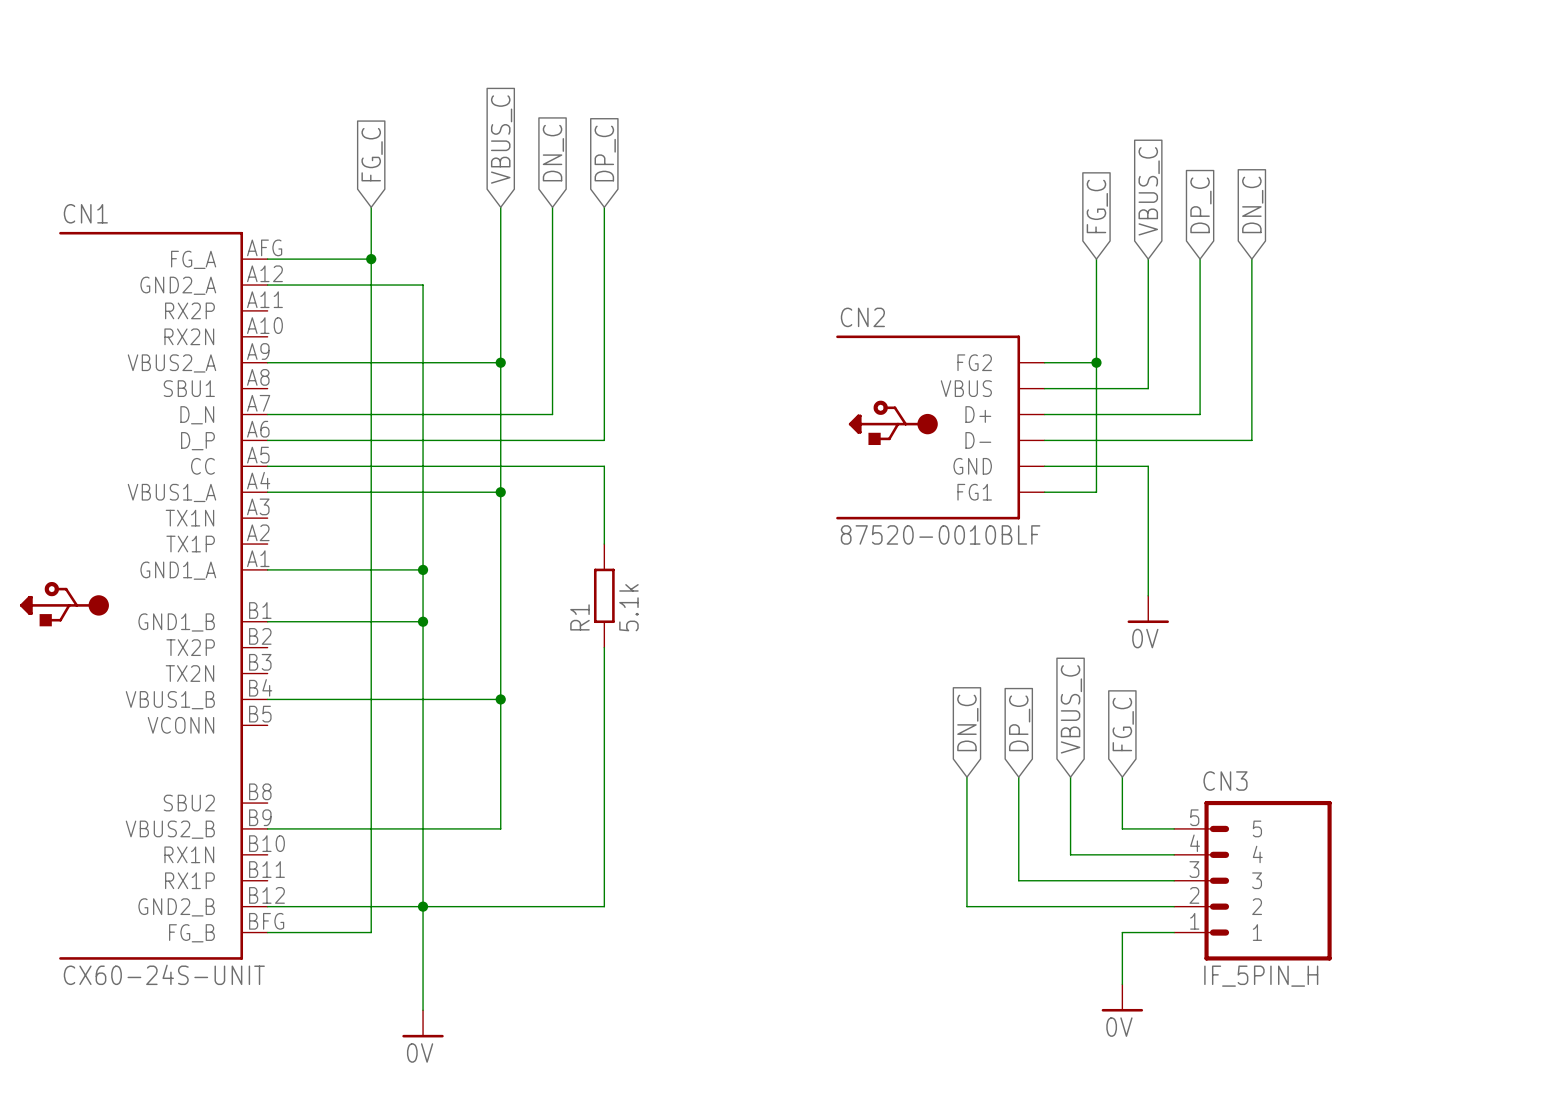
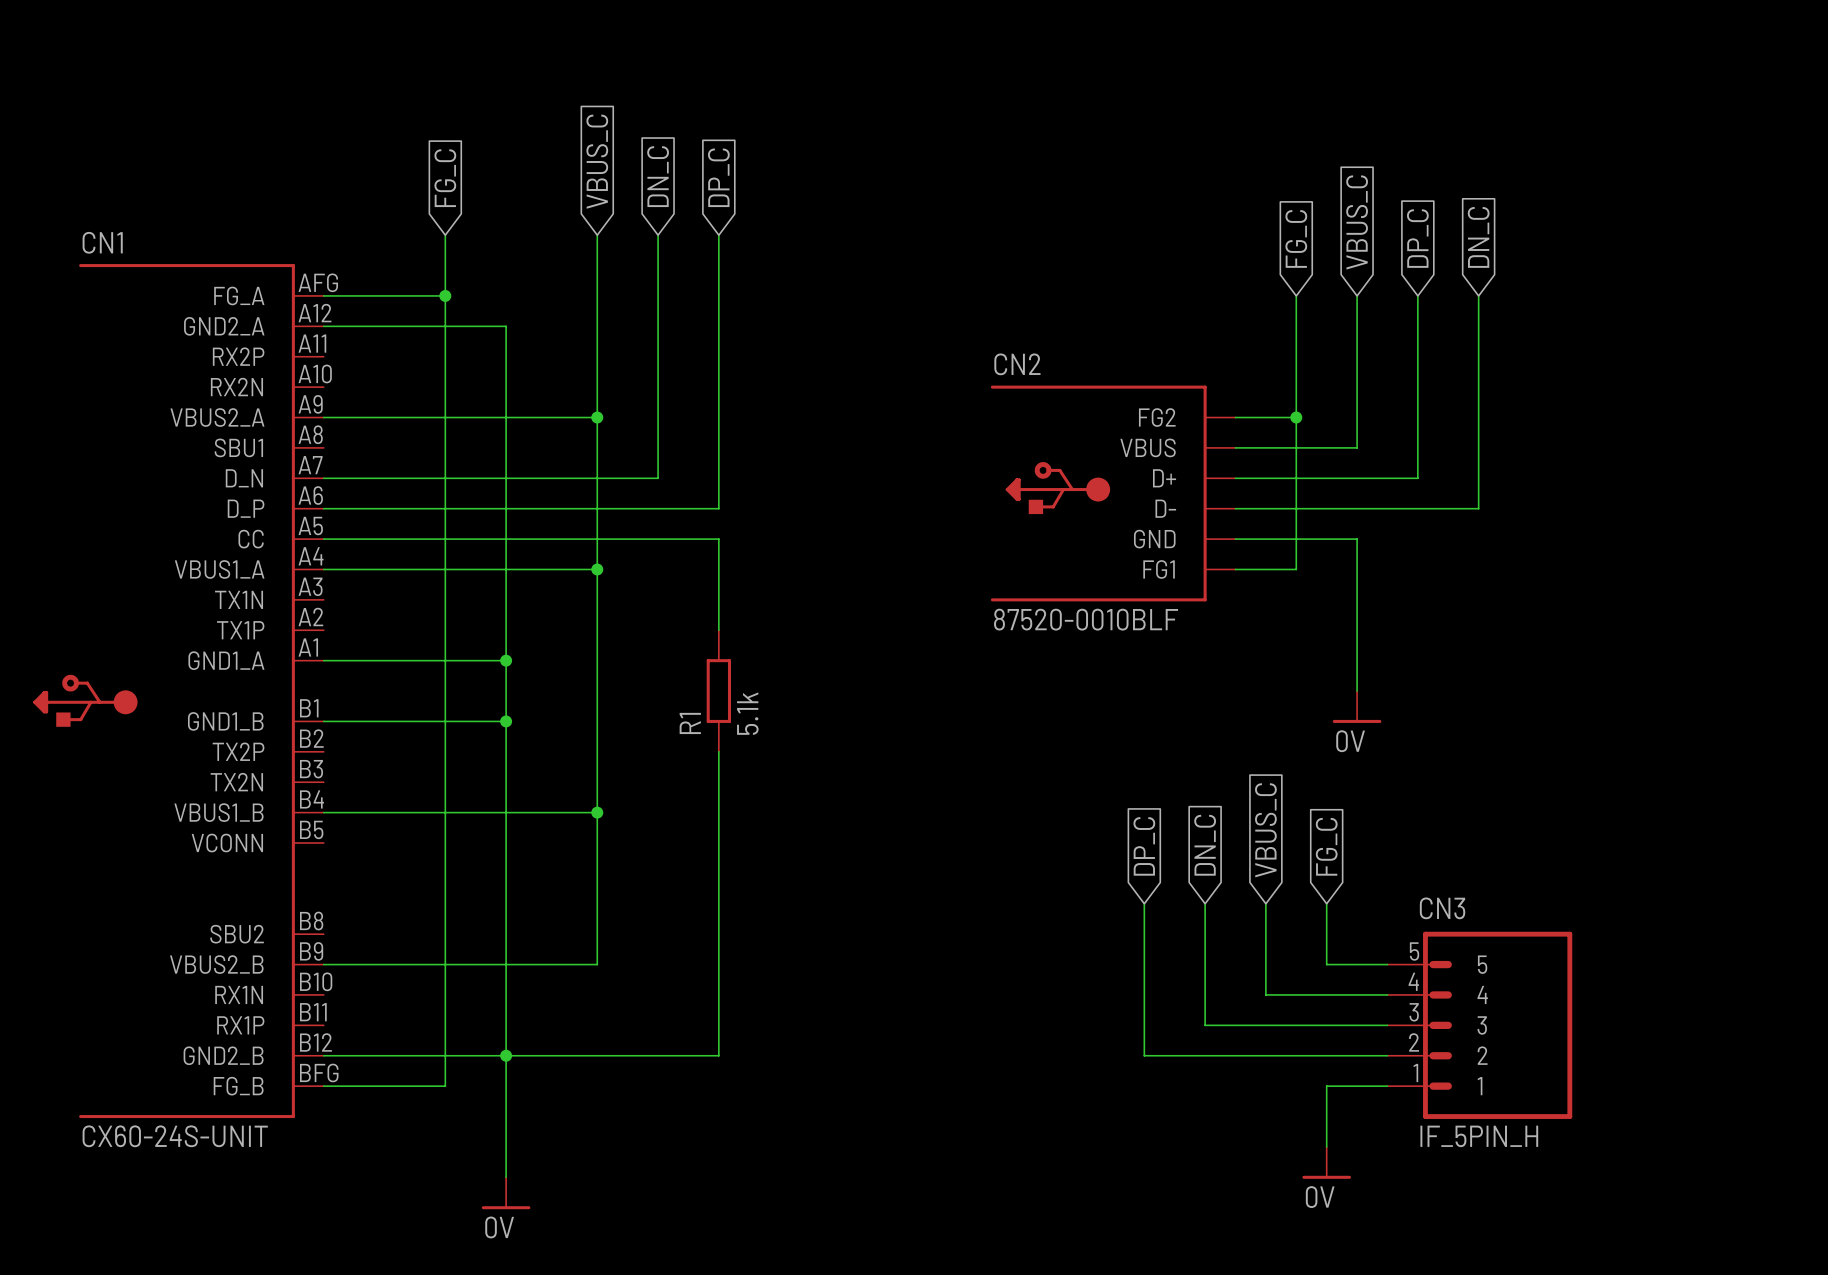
global label: DN_C (967, 722) -> DP_C (1144, 846)
global label: DP_C (1019, 723) -> DN_C (1205, 845)

